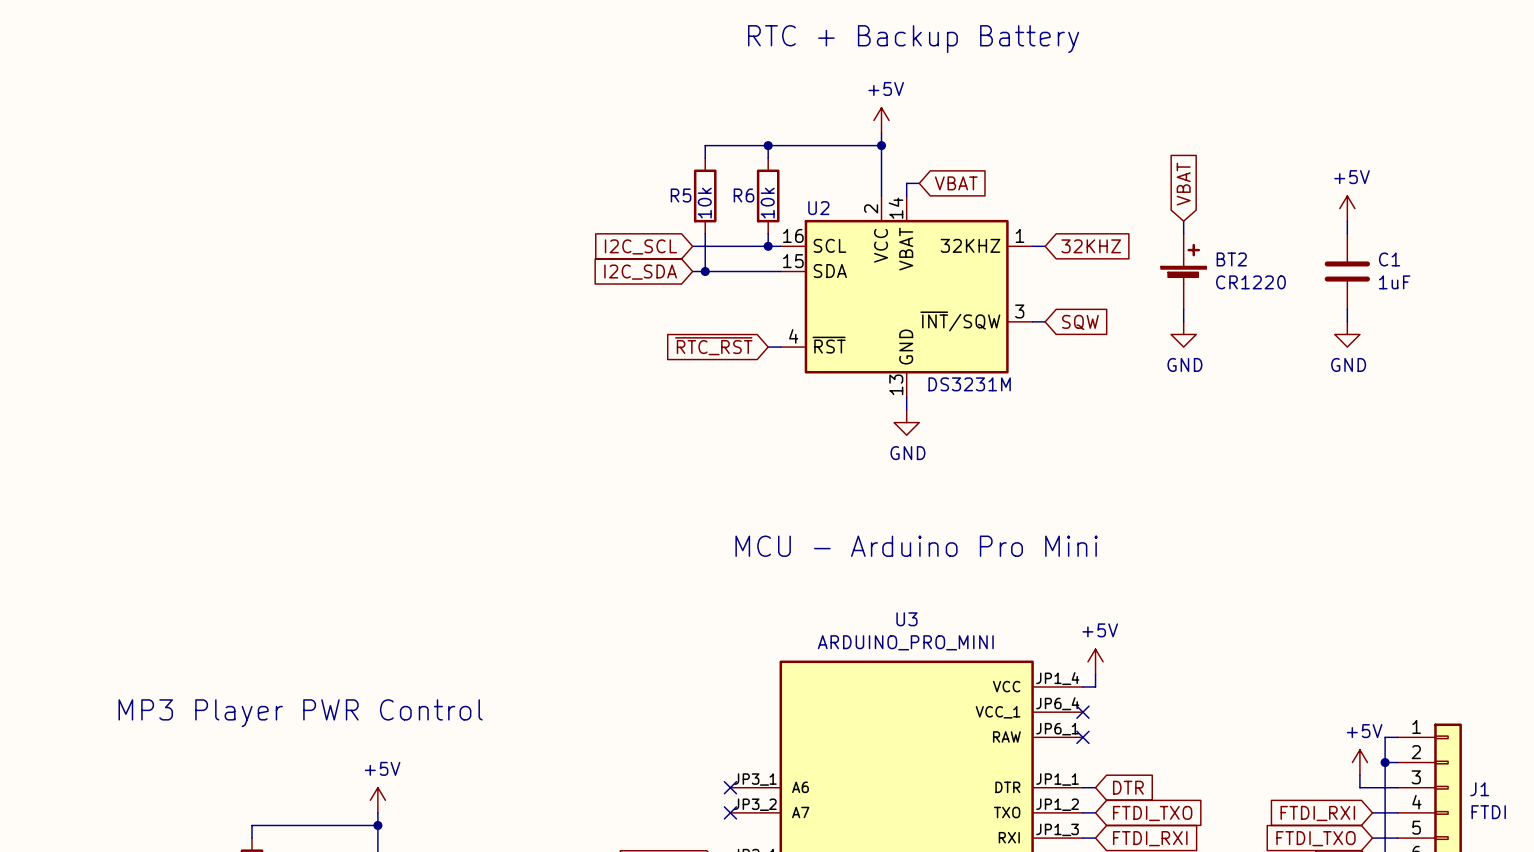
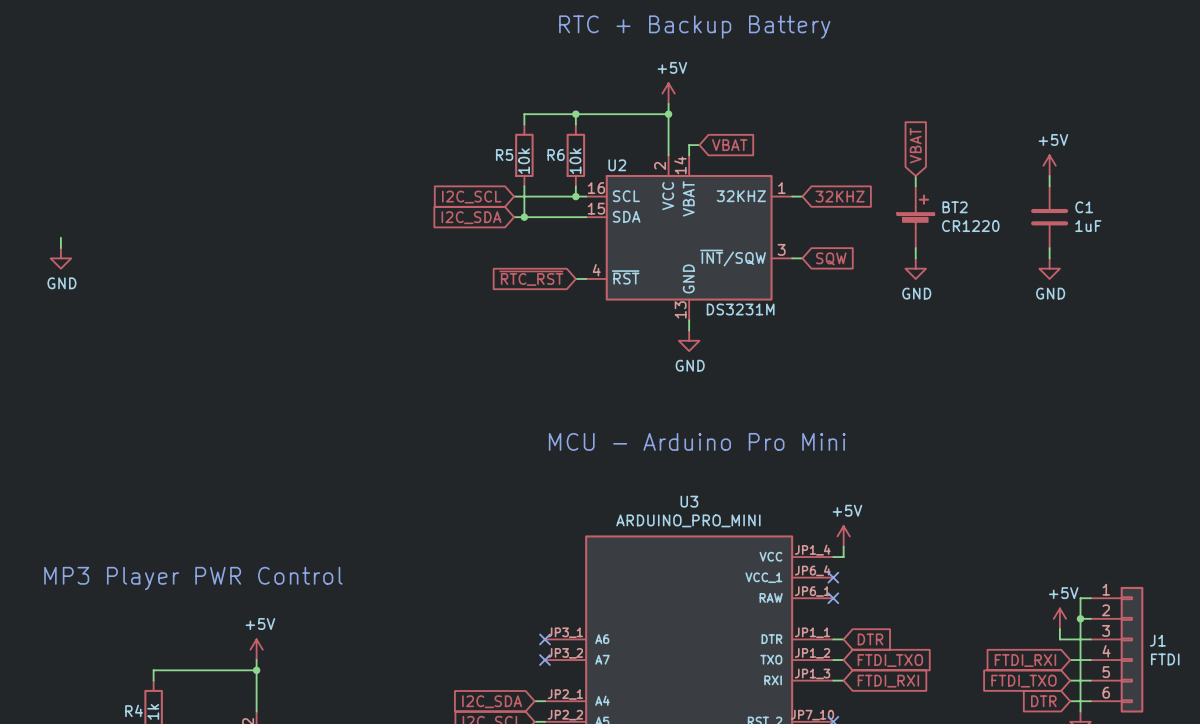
wire: none -> (60, 237) (60, 248)
power symbol: none -> GND (60, 258)

